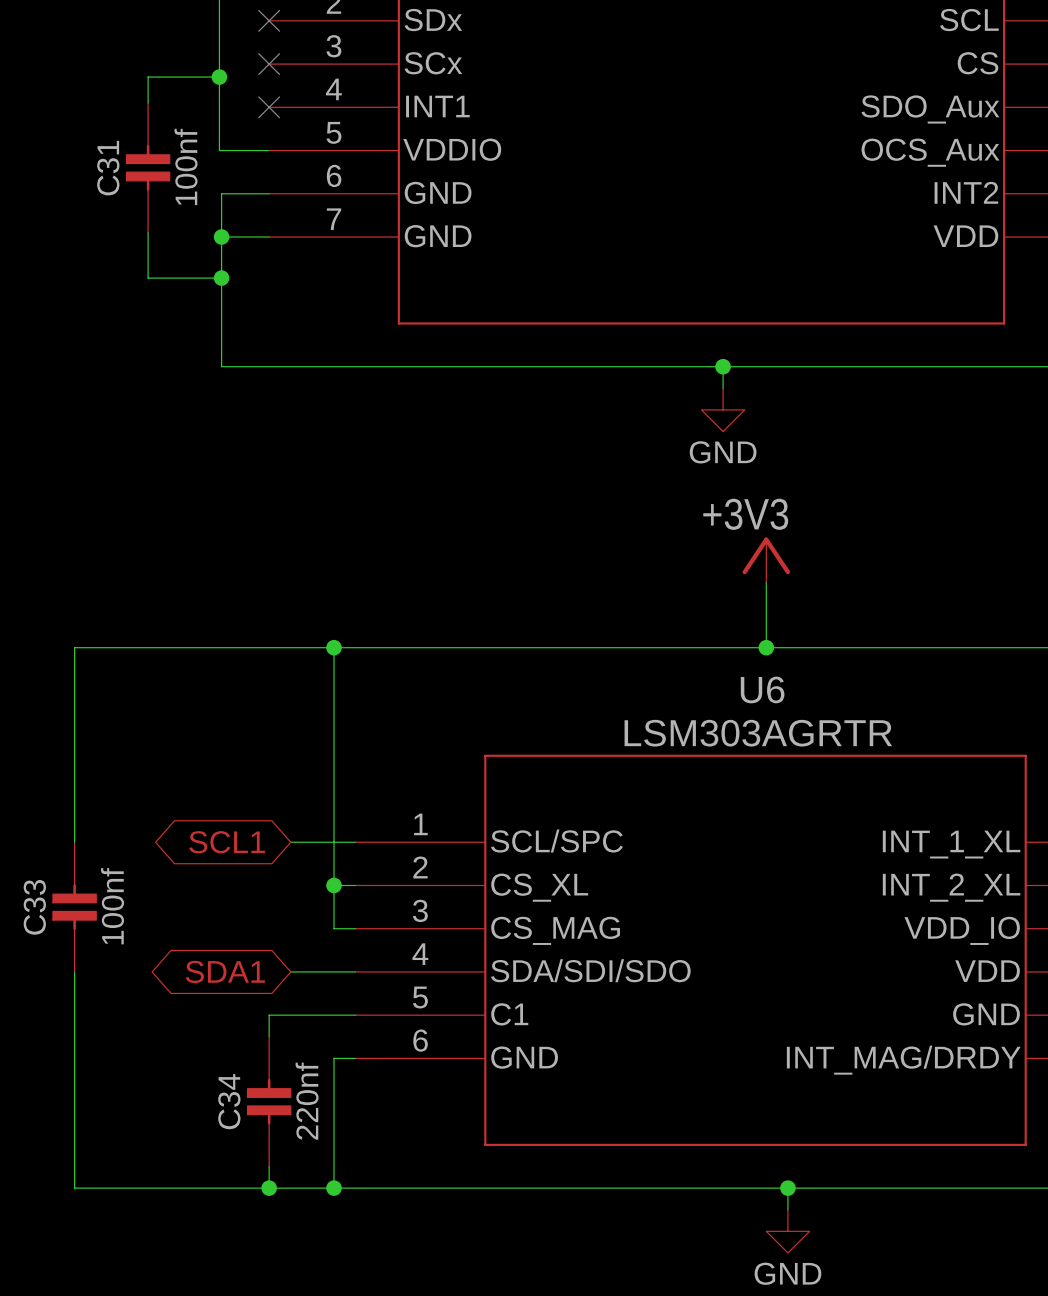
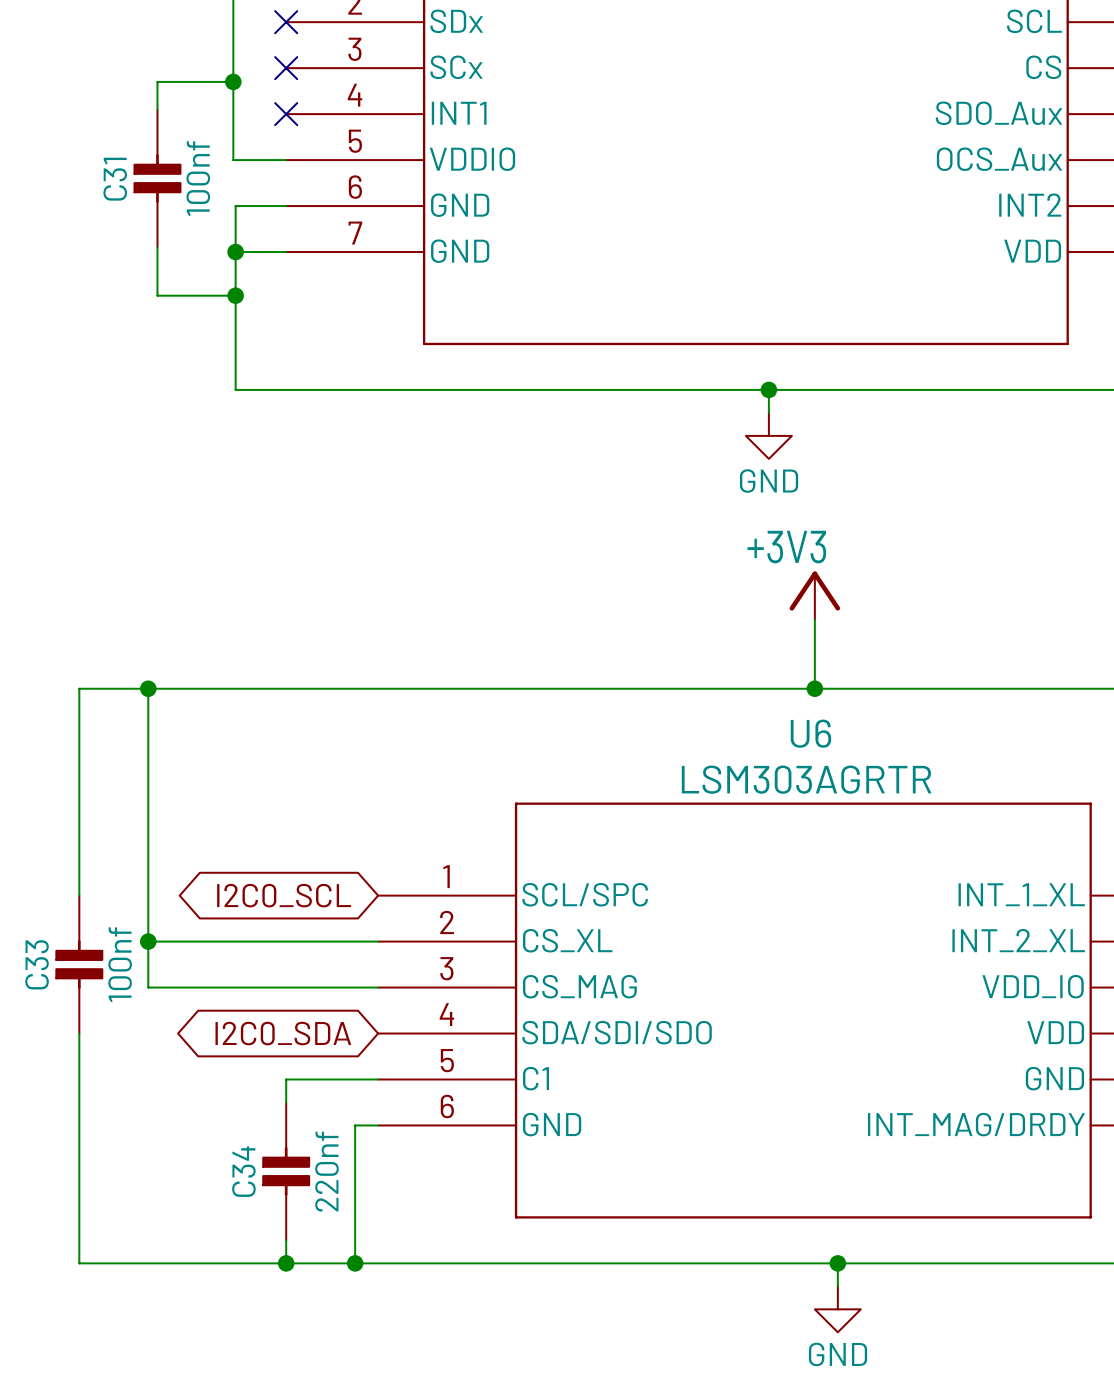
junction: none -> (148, 688)
wire: (333, 647) (333, 928) -> (148, 688) (148, 987) (355, 987)
junction: (333, 647) -> none
global label: SCL1 (227, 842) -> none
wire: (290, 842) (355, 842) -> none
global label: none -> I2C0_SCL (284, 895)
wire: none -> (148, 941) (355, 941)
junction: none -> (148, 941)
junction: (333, 885) -> none
global label: SDA1 (225, 971) -> none
wire: (290, 971) (355, 971) -> none
global label: none -> I2C0_SDA (283, 1033)

